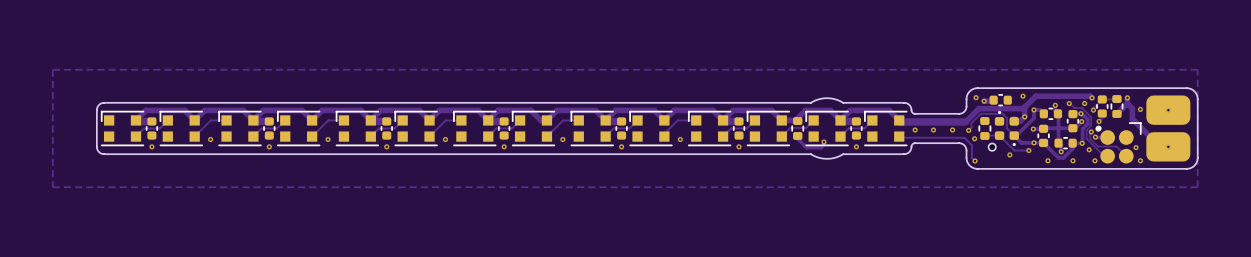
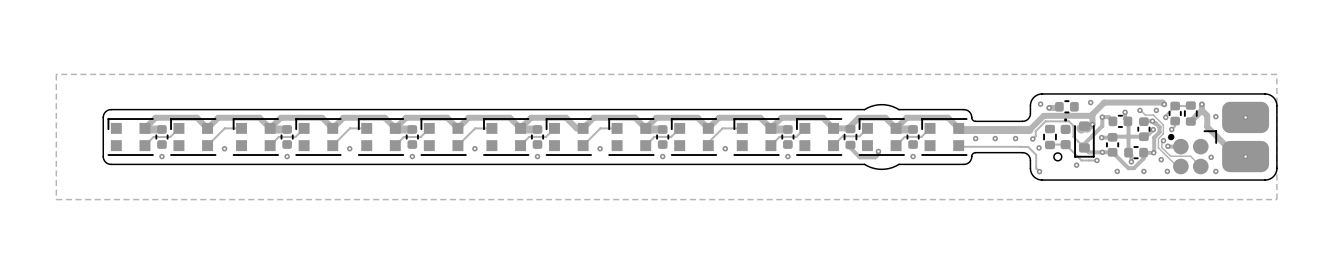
part footprint: [1009, 117, 1019, 146] -> [1074, 121, 1095, 158]

